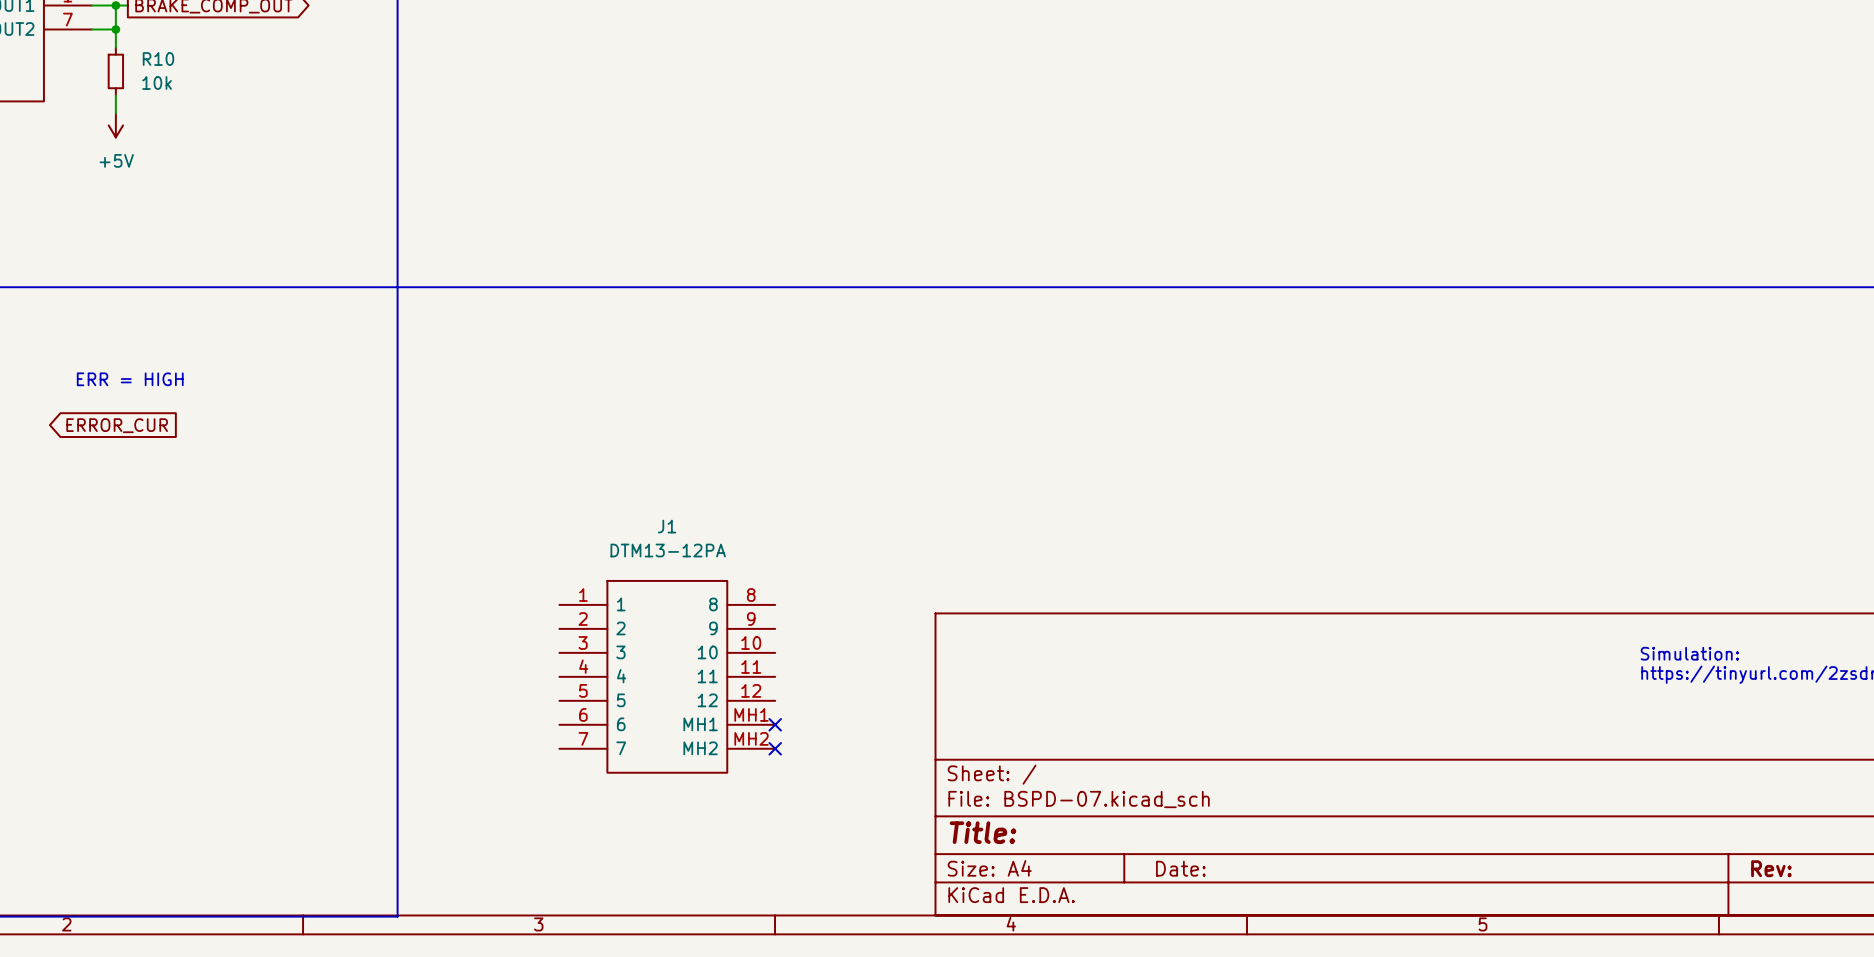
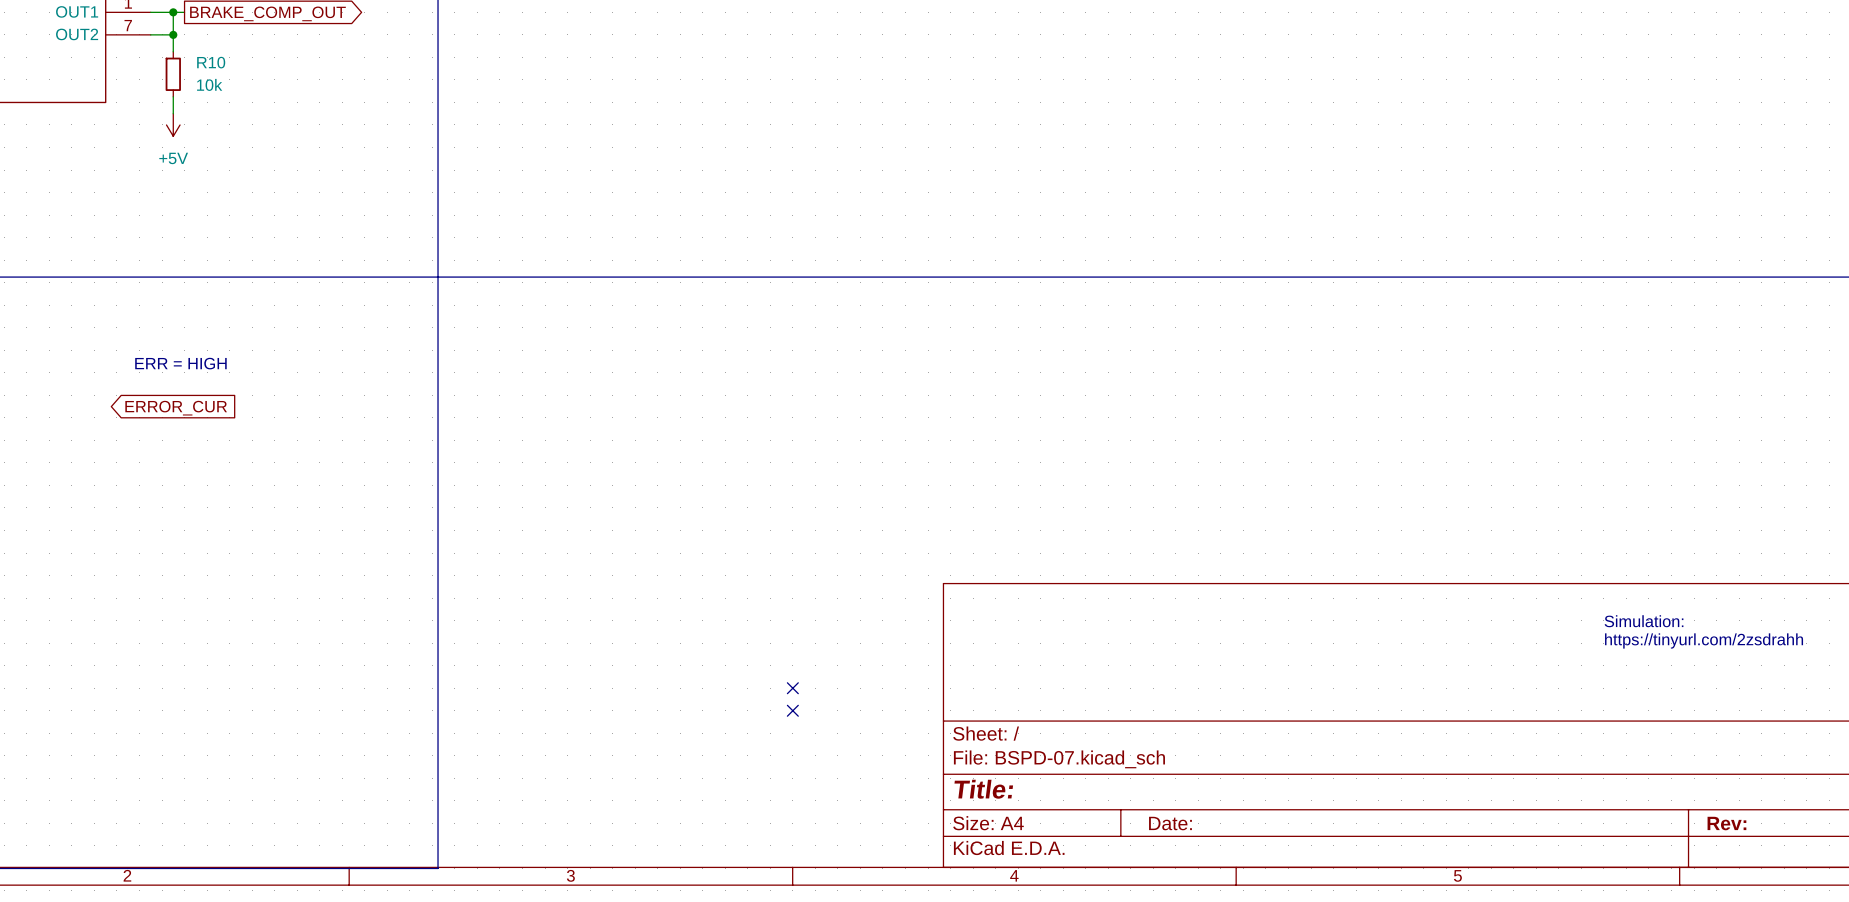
J1: DTM13-12PA (667, 676) -> none

